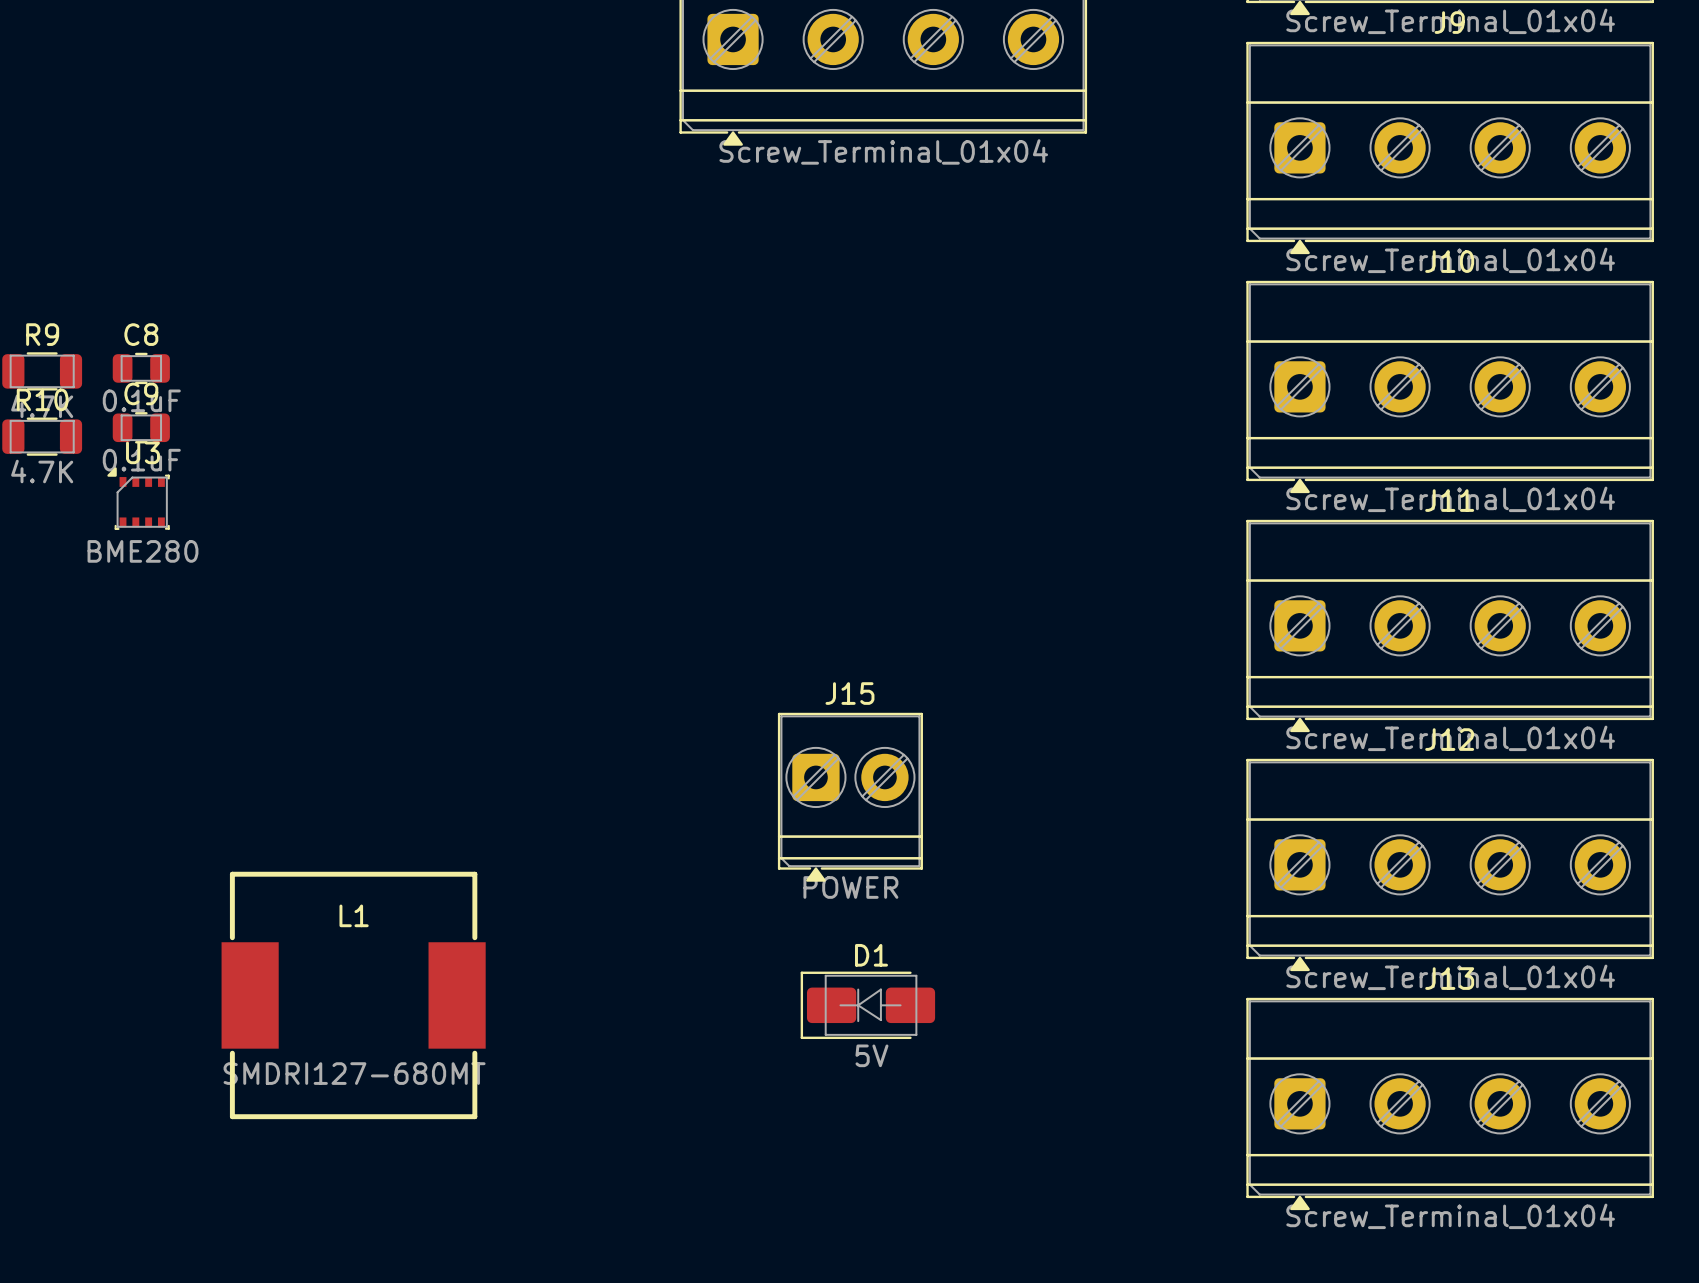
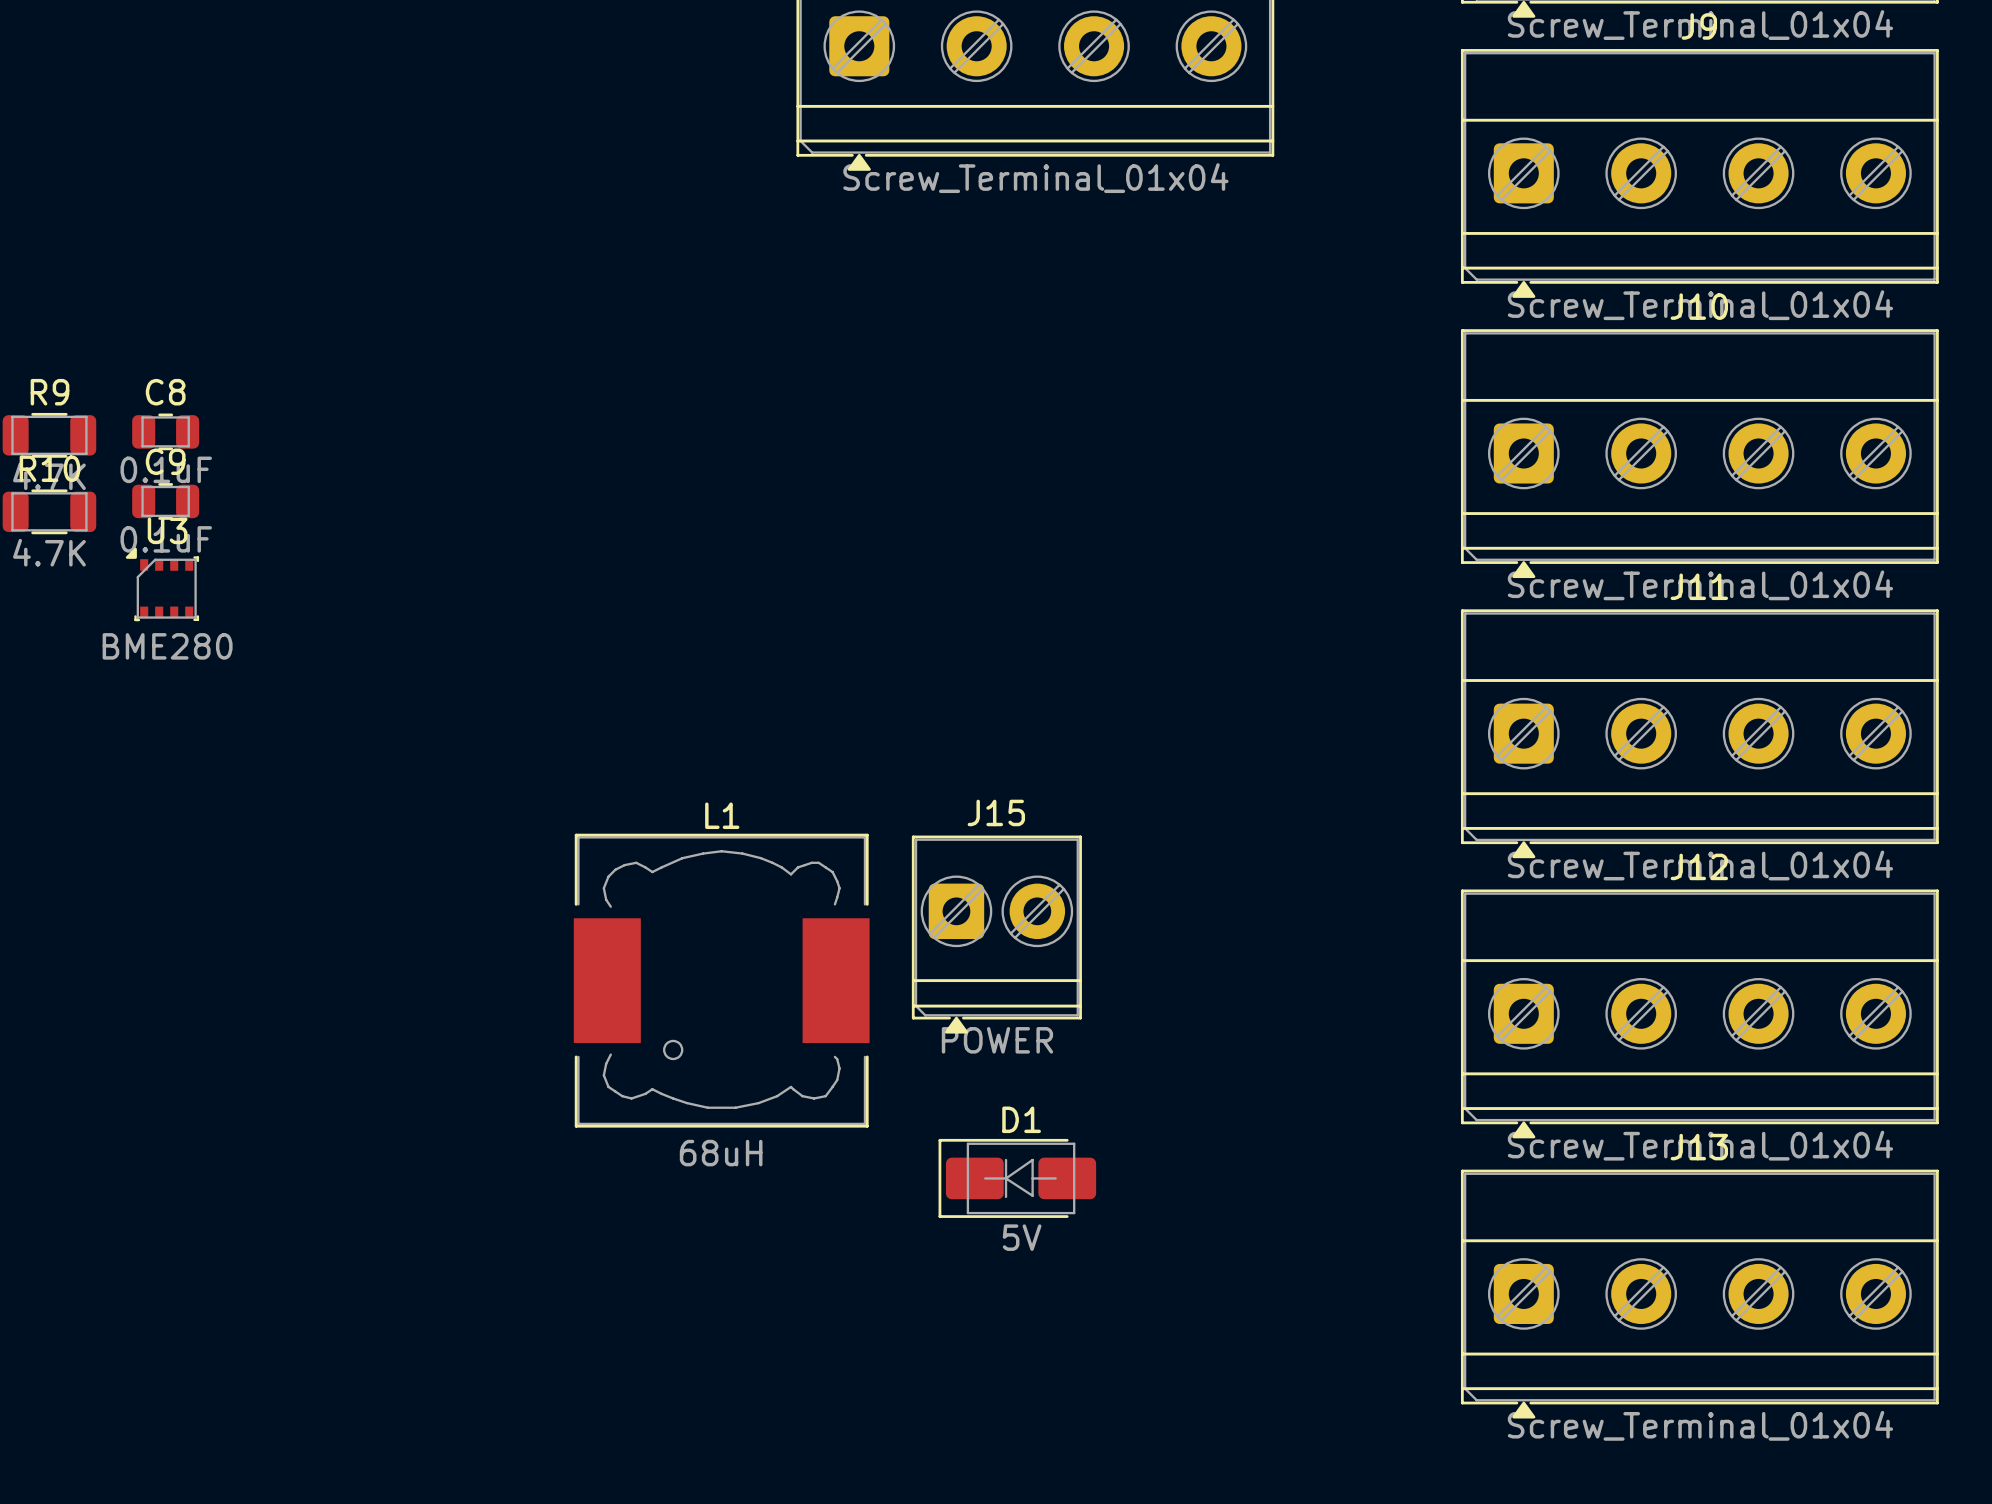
L1 footprint: [221, 871, 486, 1120] -> [573, 833, 870, 1128]
L1 name position: L1 (354, 915) -> L1 (722, 815)
L1 value: SMDRI127-680MT (354, 1073) -> 68uH (721, 1153)

